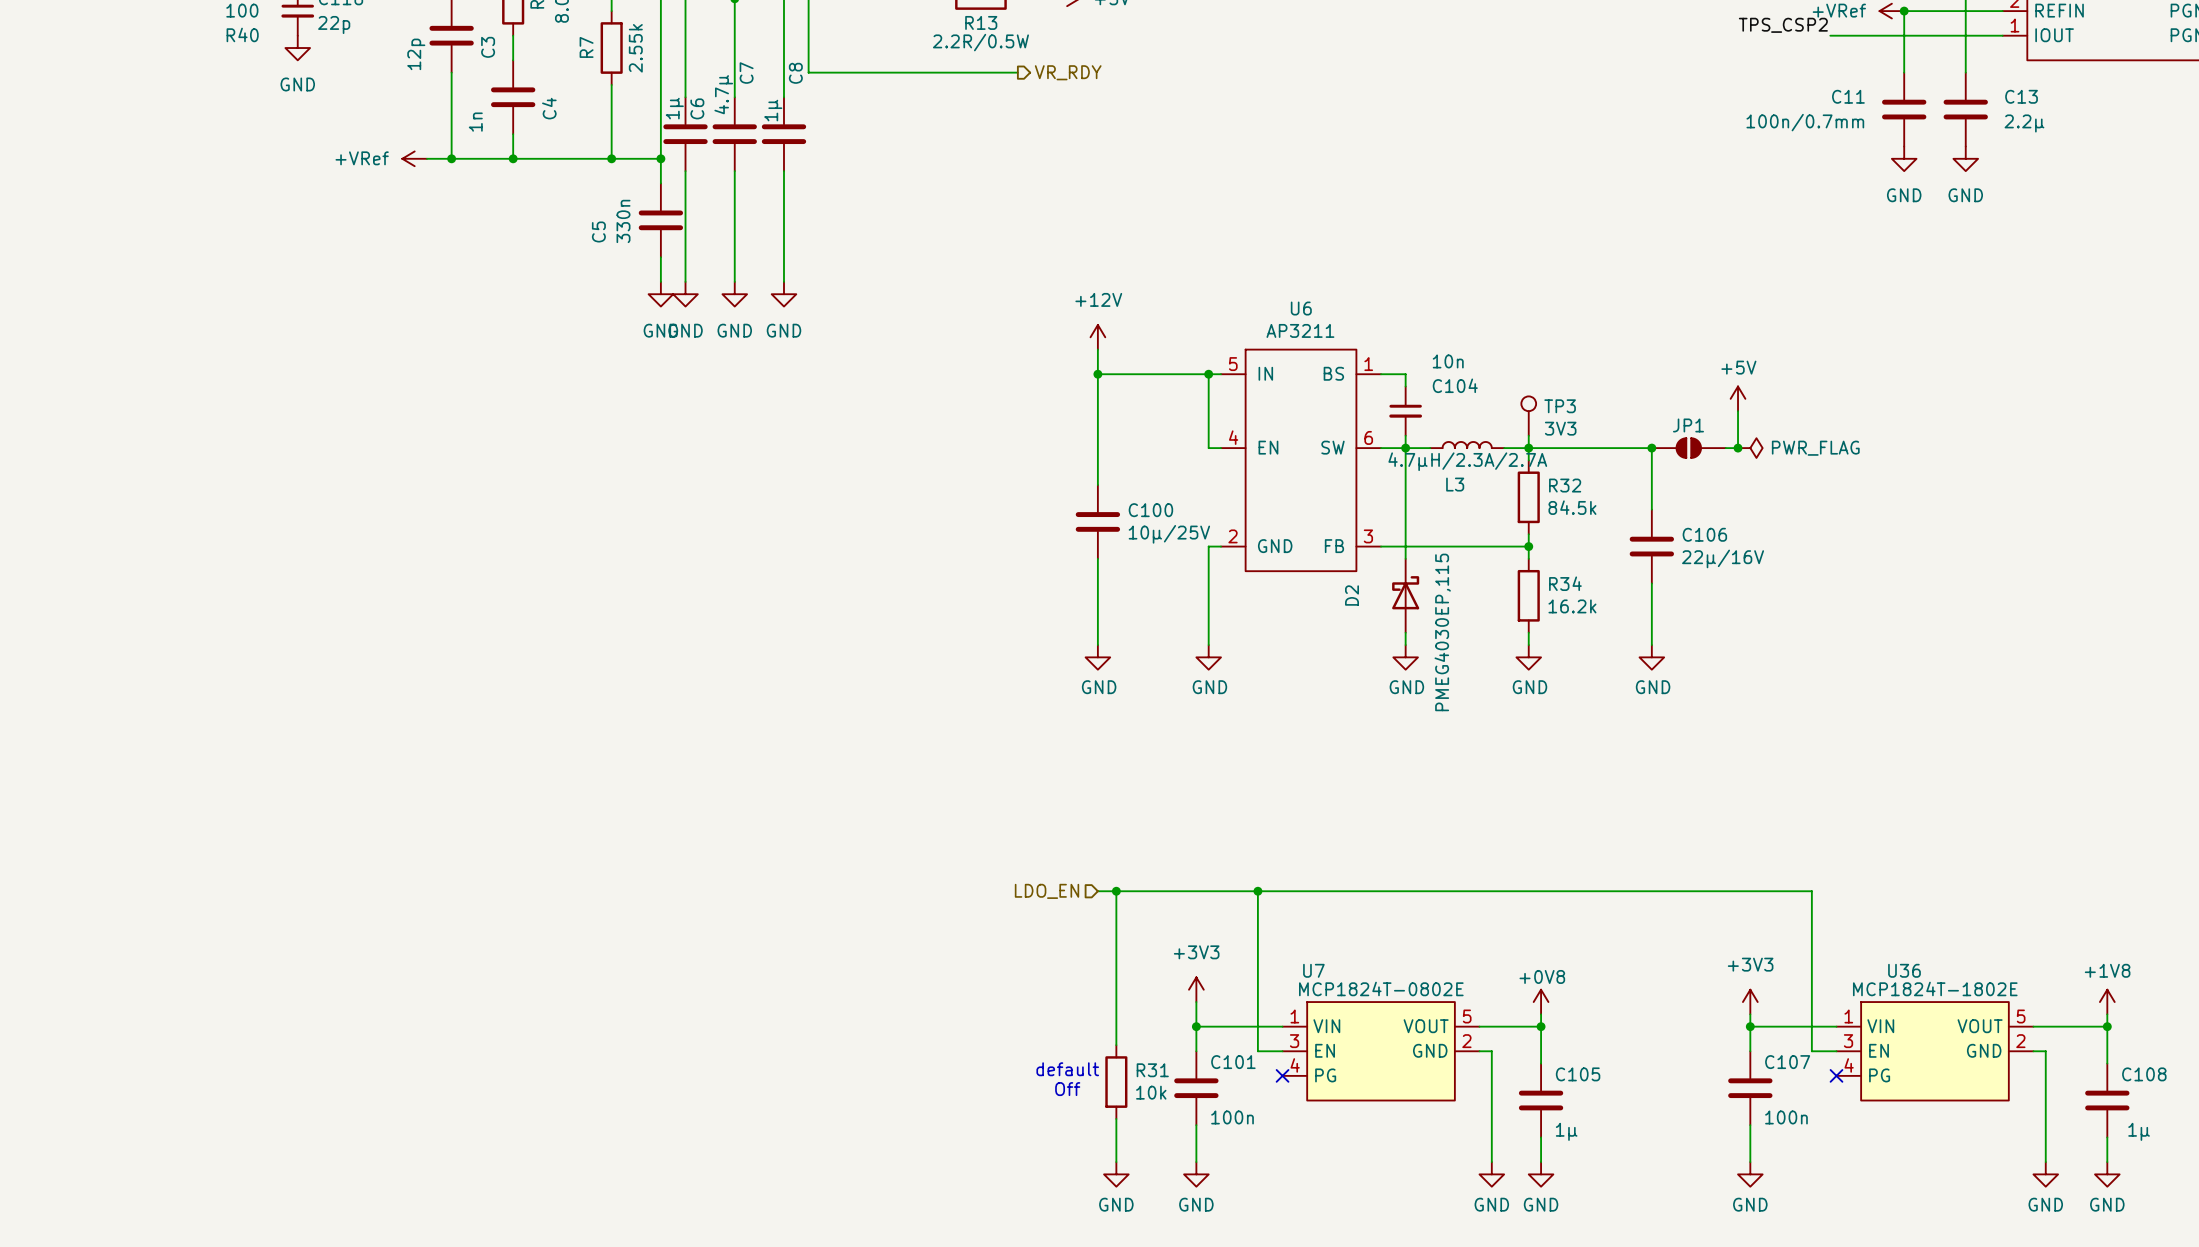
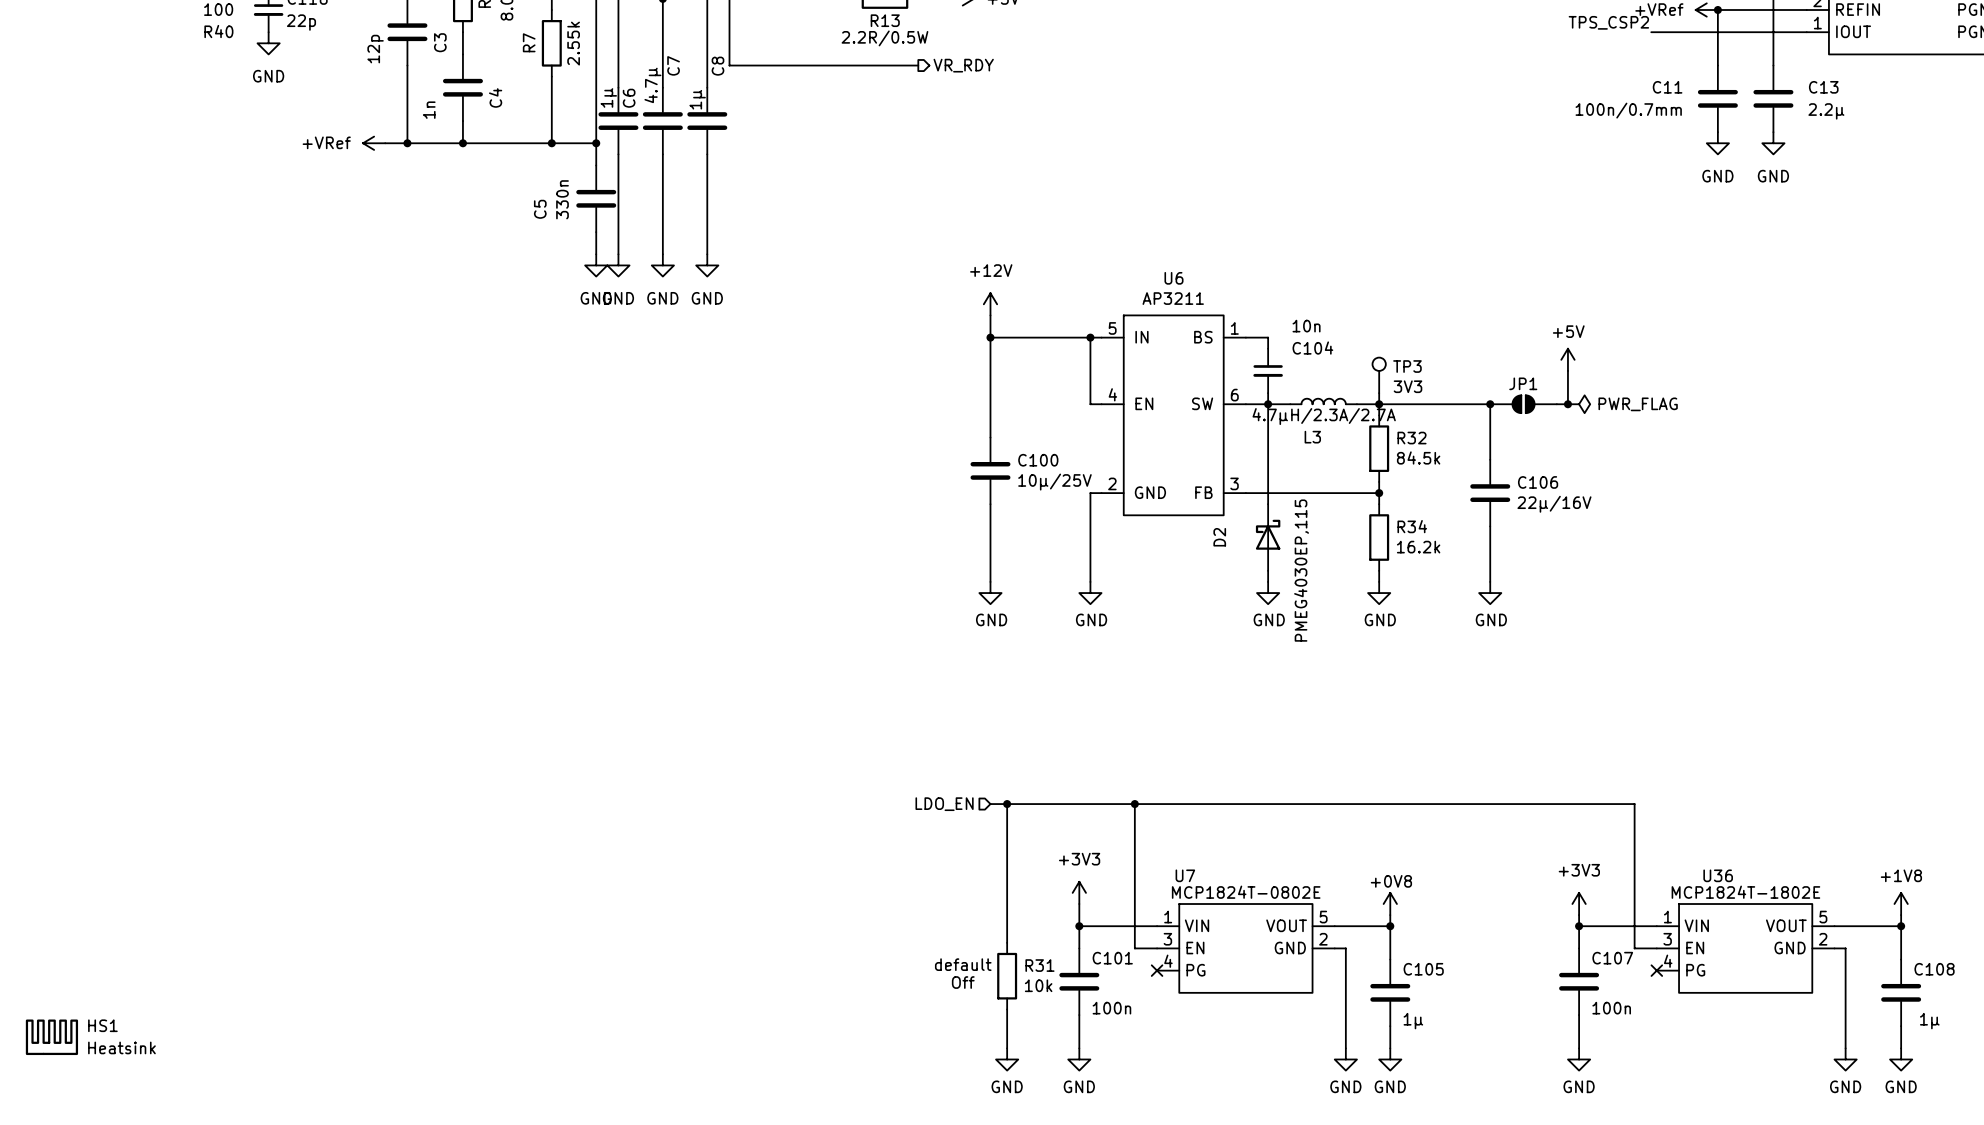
HS1: none -> Heatsink (51, 1037)

